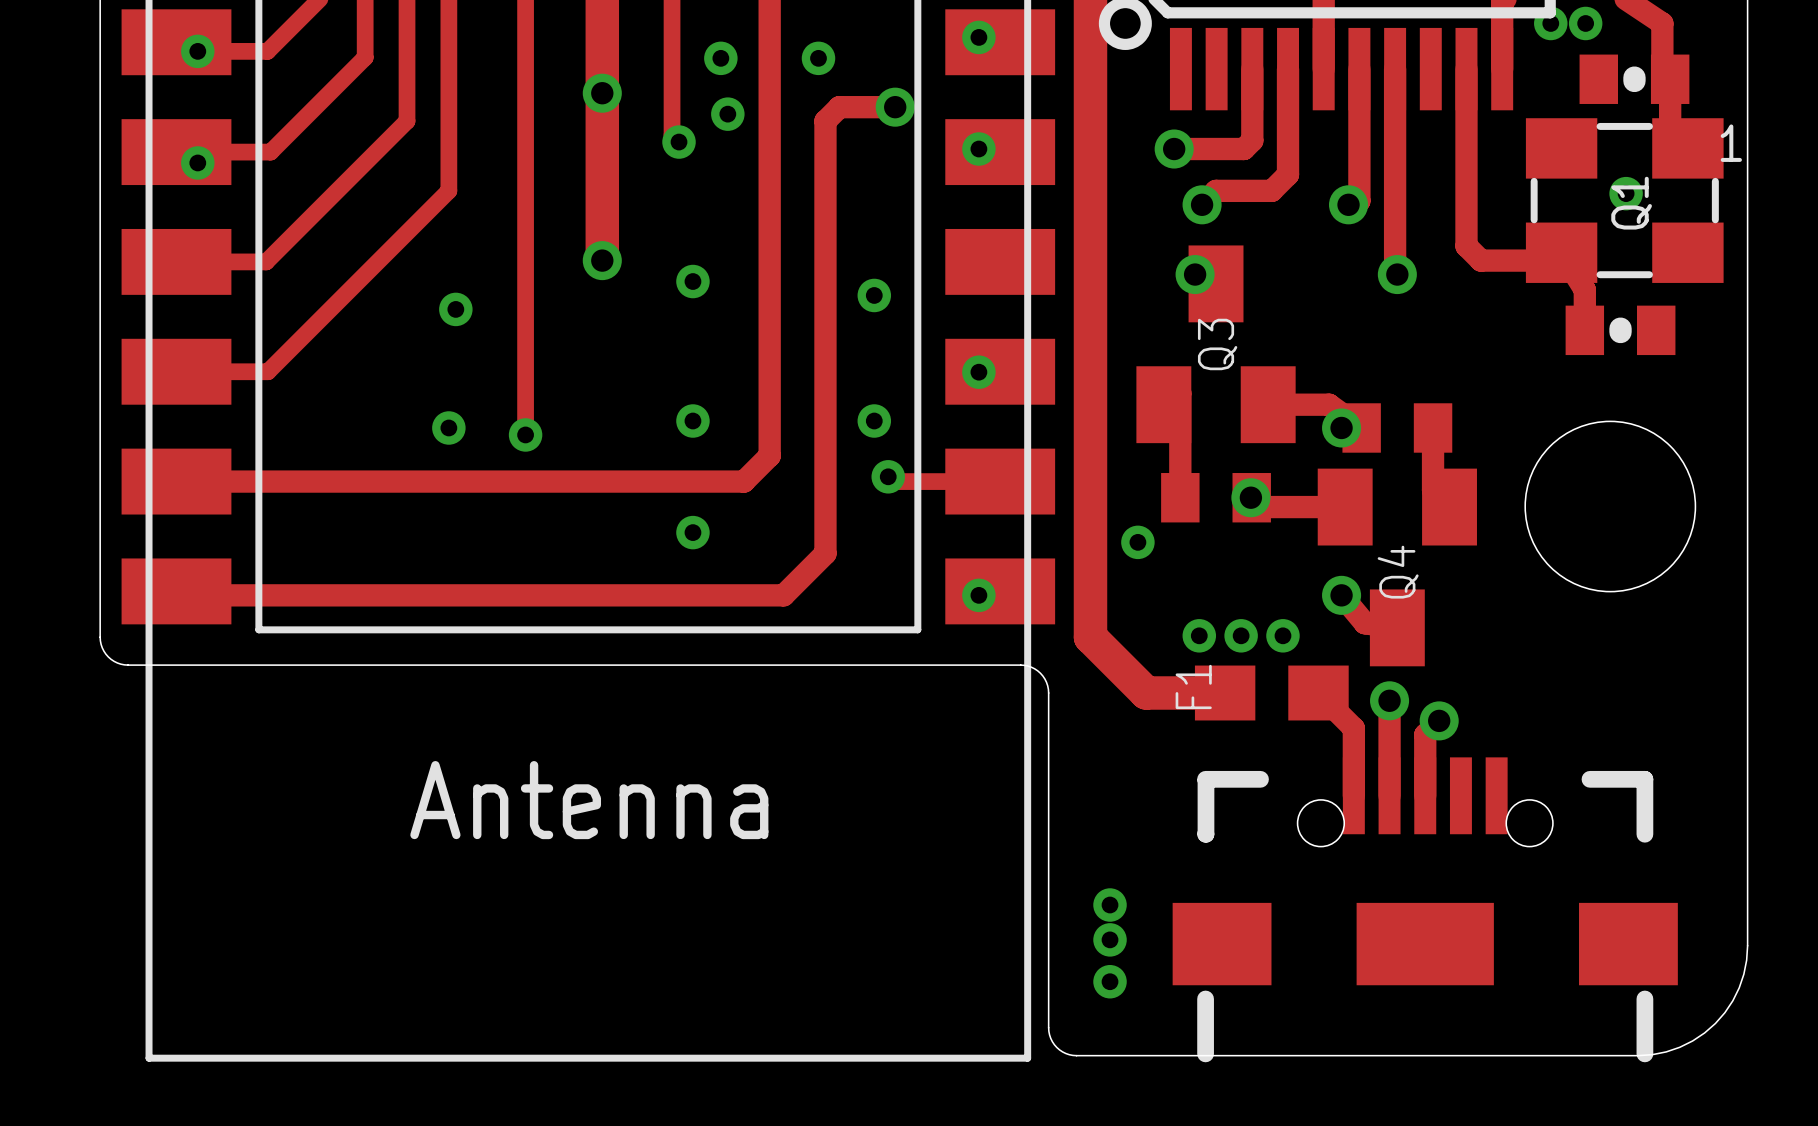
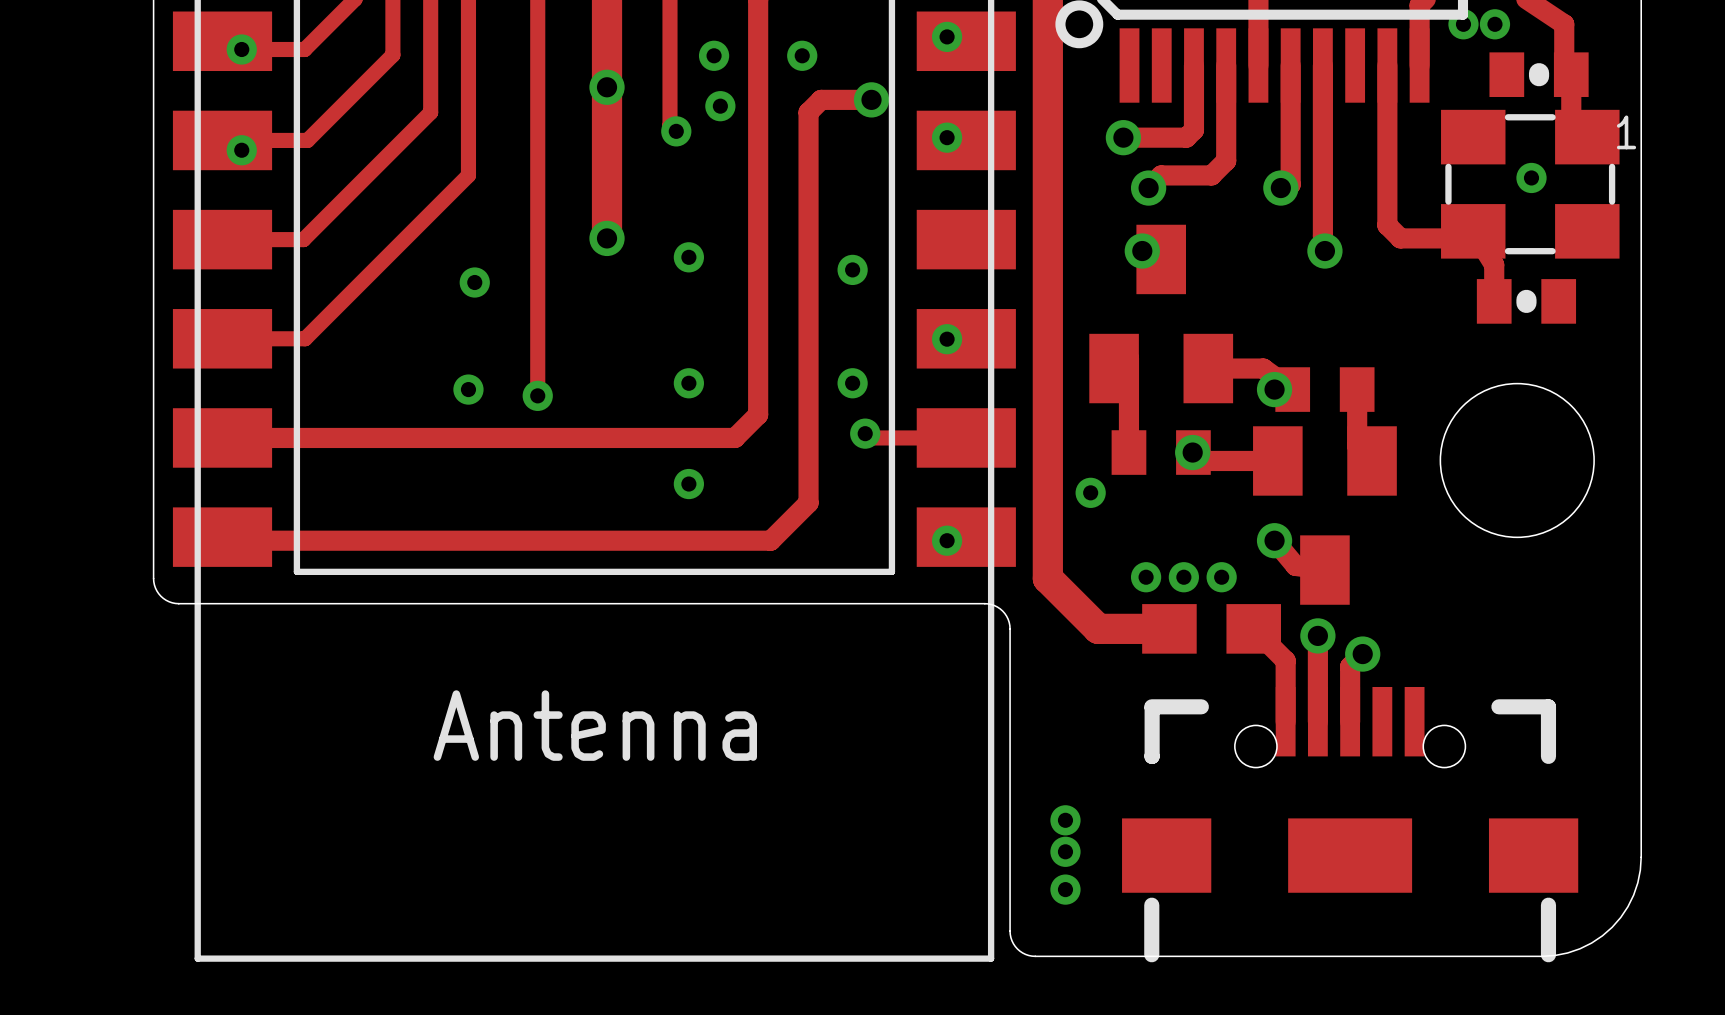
Q1 name: Q1 (1631, 203) -> none
Q3 name: Q3 (1217, 344) -> none
Q4 name: Q4 (1398, 572) -> none
F1 name: F1 (1193, 686) -> none

